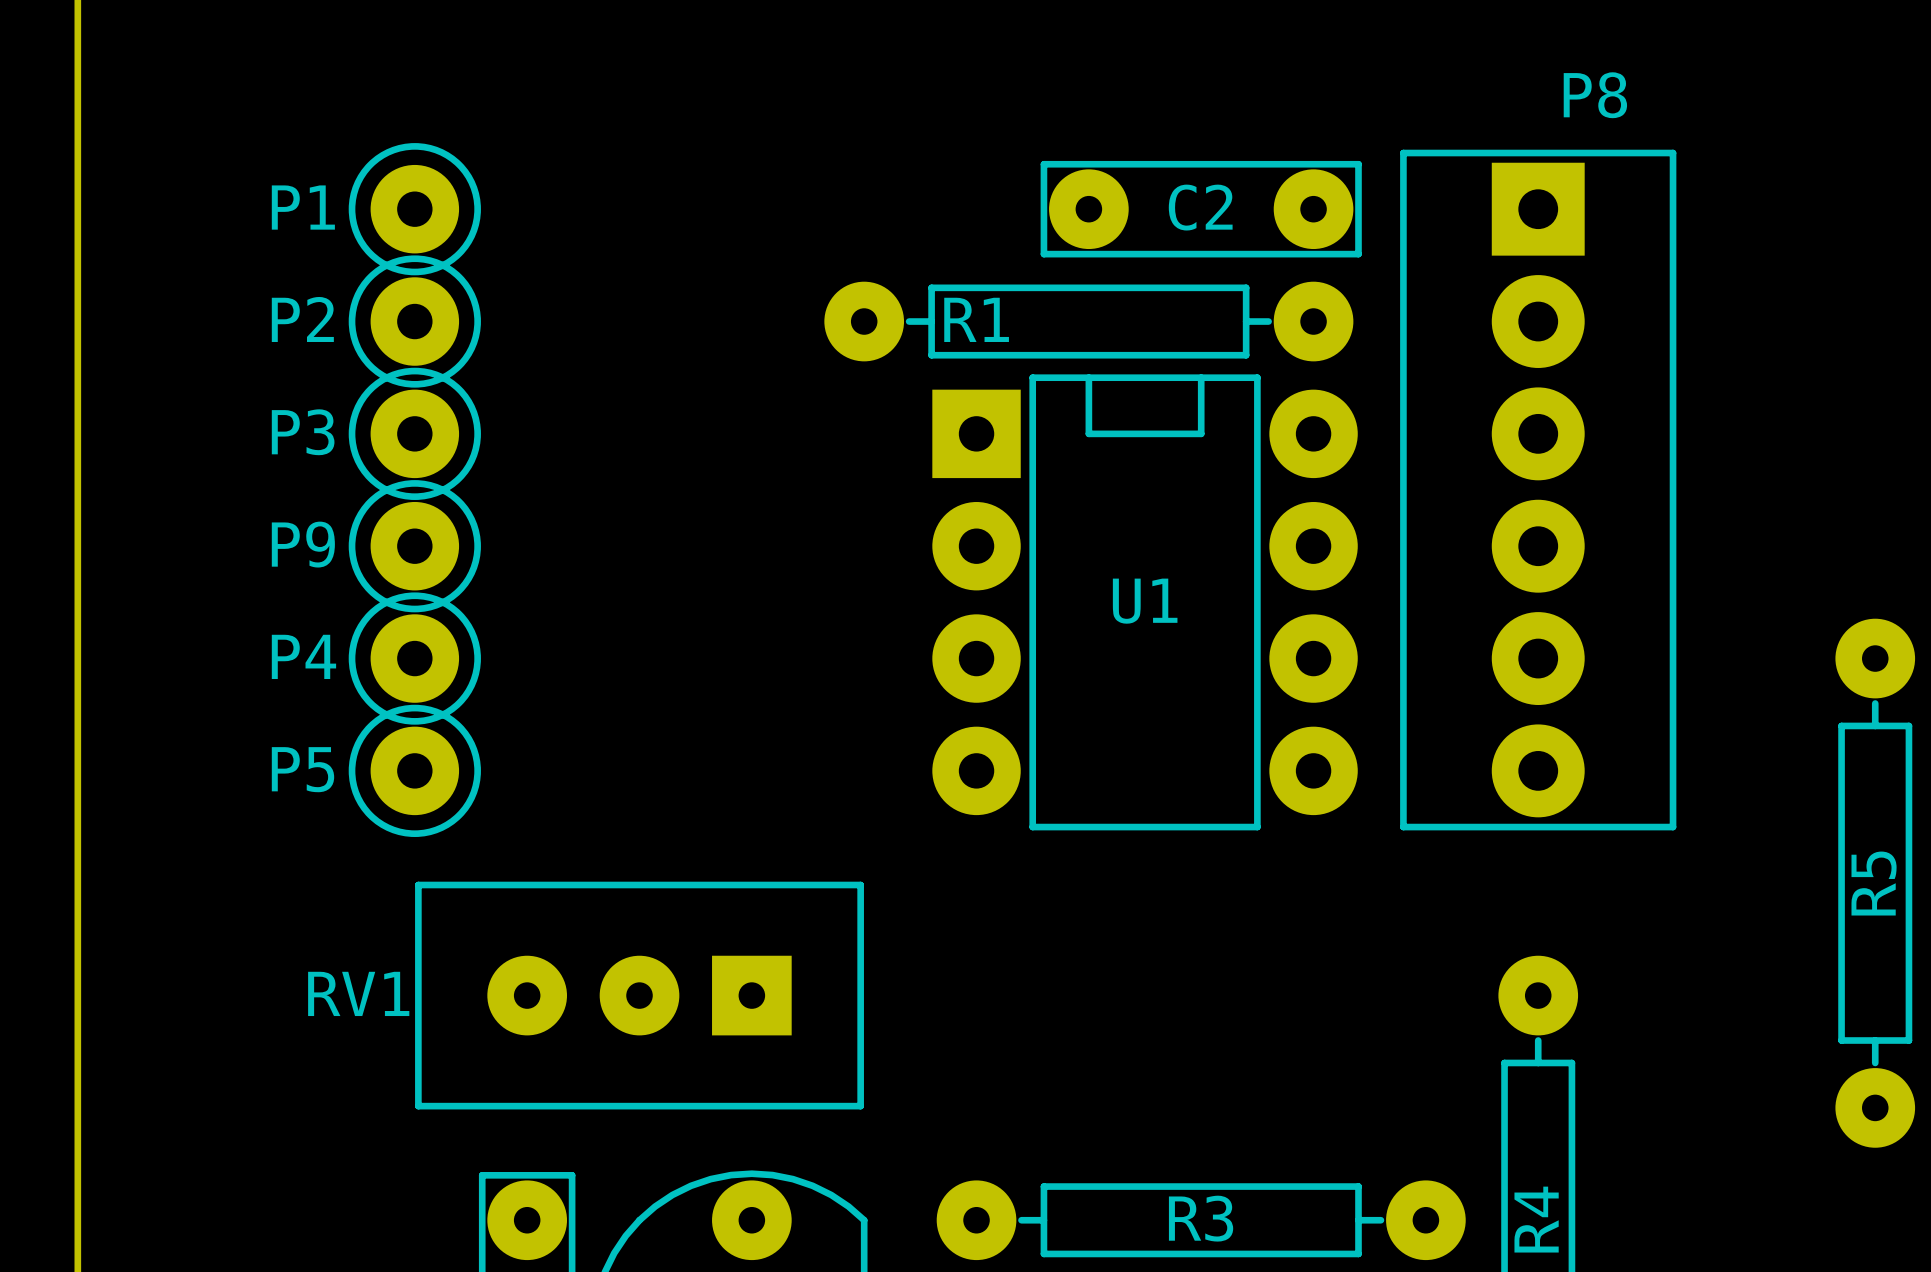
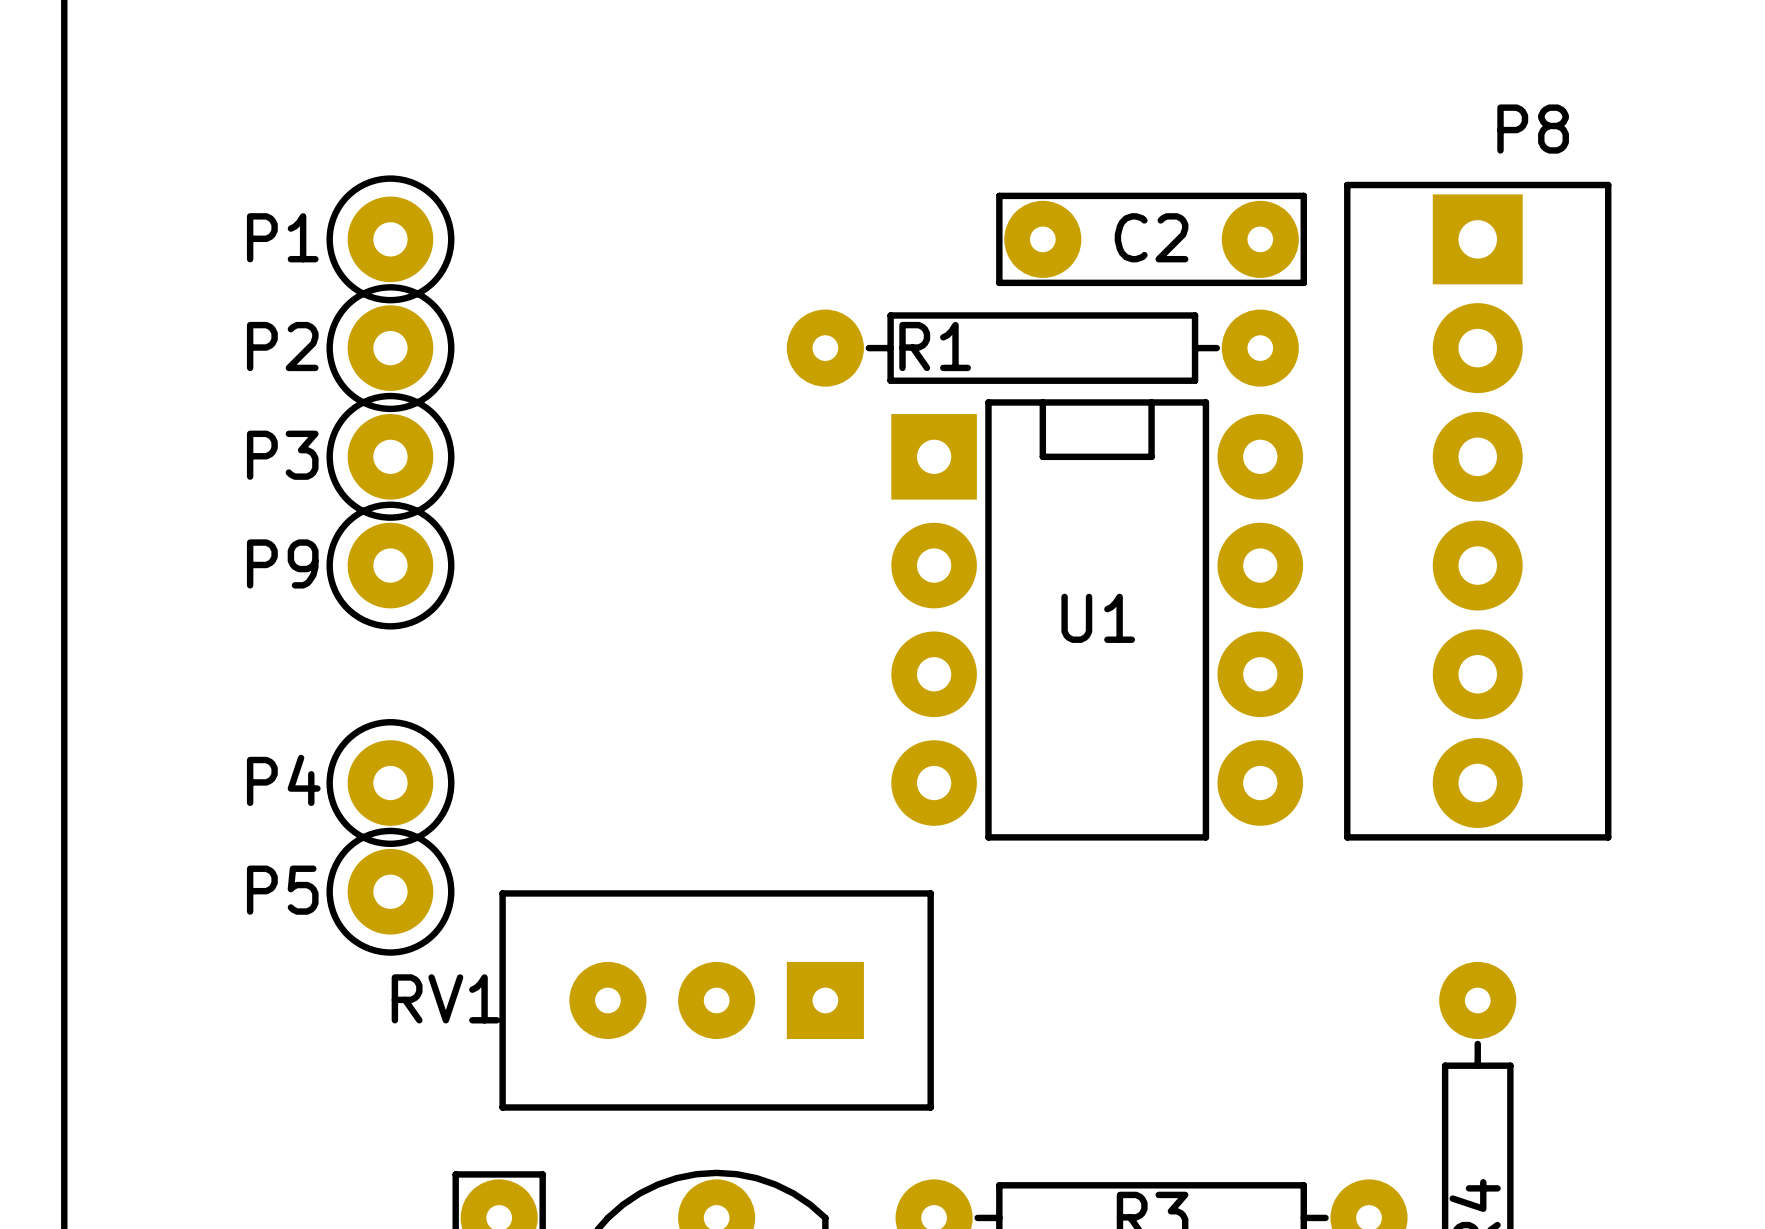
P4: (414, 658) -> none
P5 name: P5 (302, 769) -> P4 (283, 780)
P5: none -> (390, 891)
RV1 position: (639, 995) -> (716, 1000)

